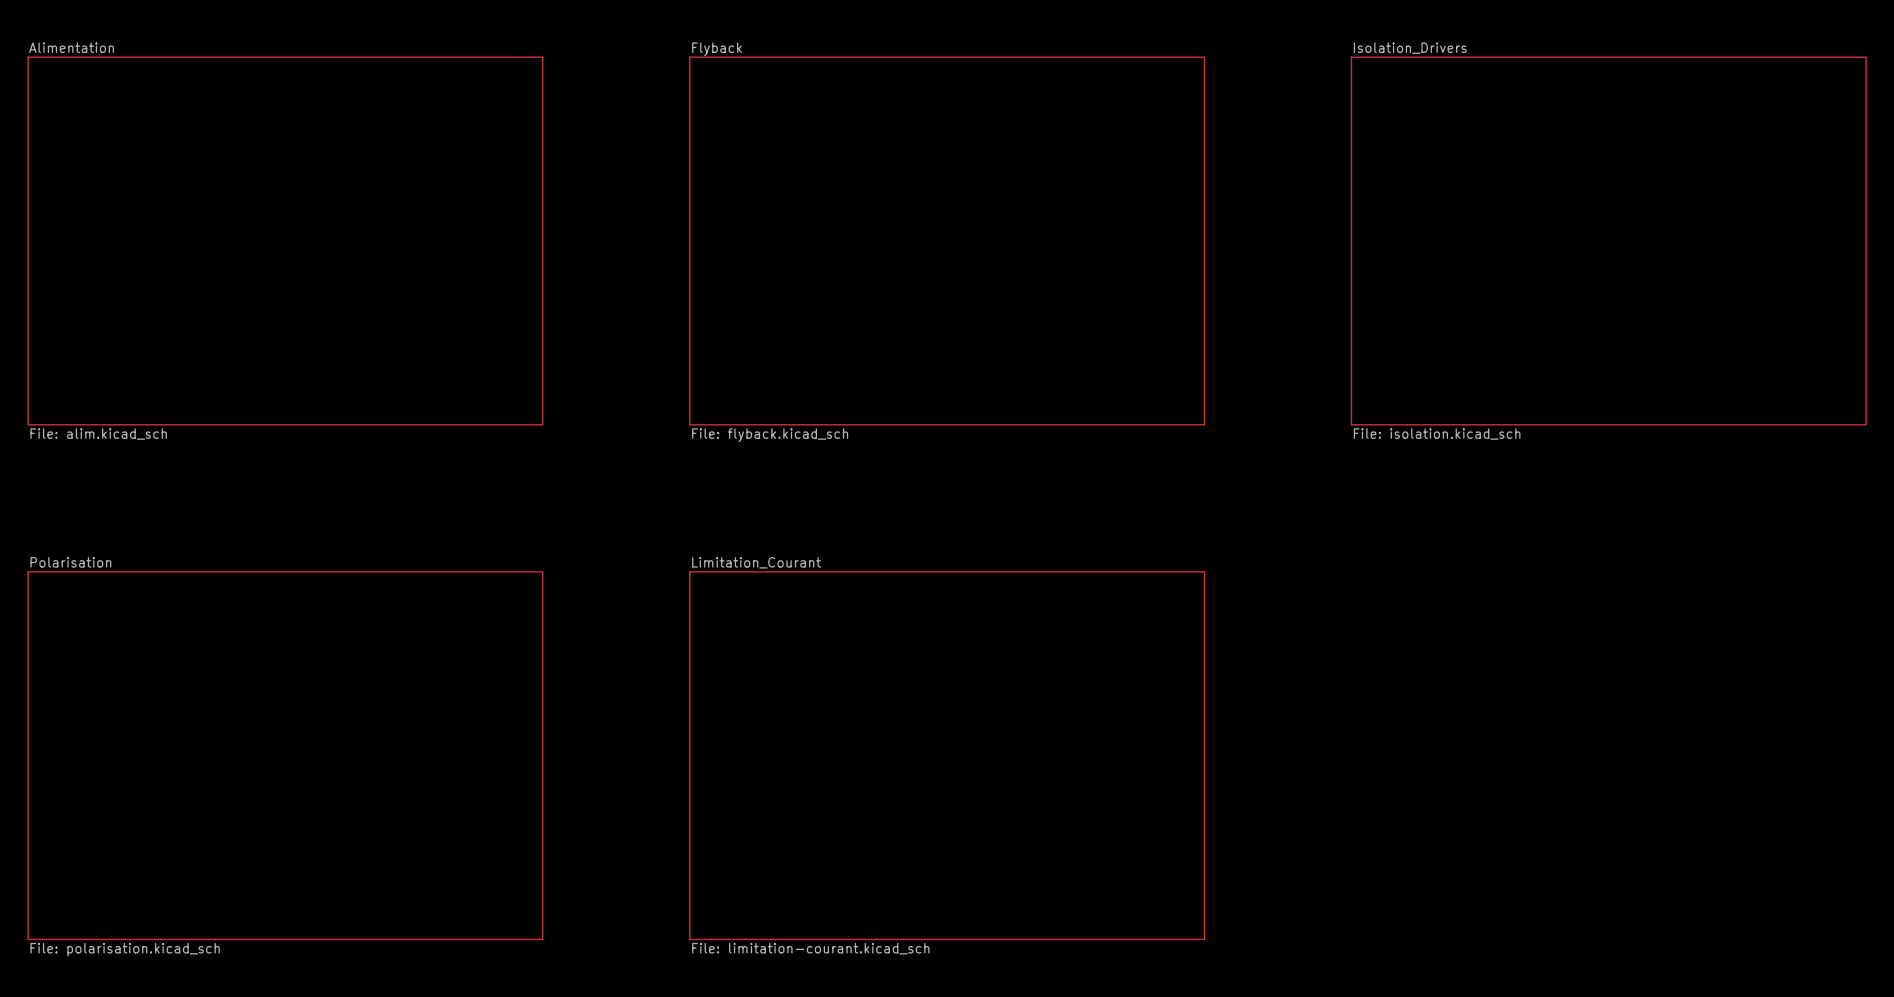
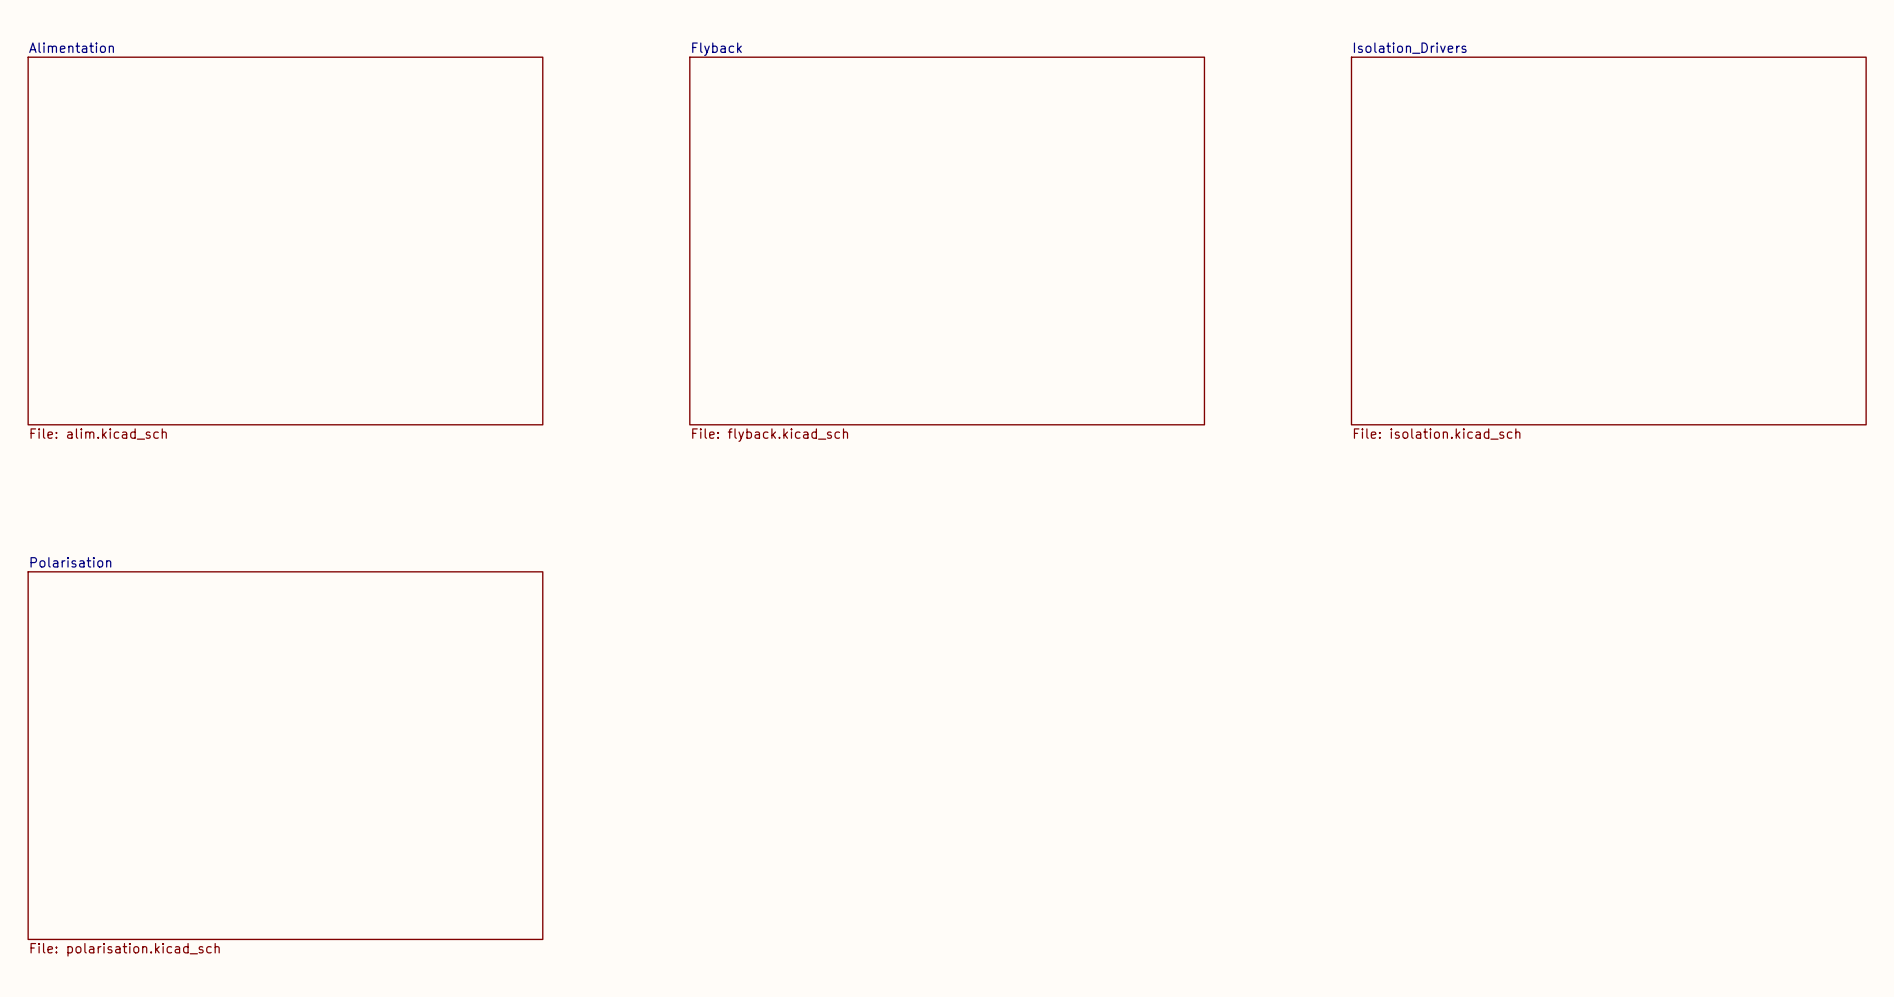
sheet Limitation_Courant: File: limitation-courant.kicad_sch (947, 755) -> none

